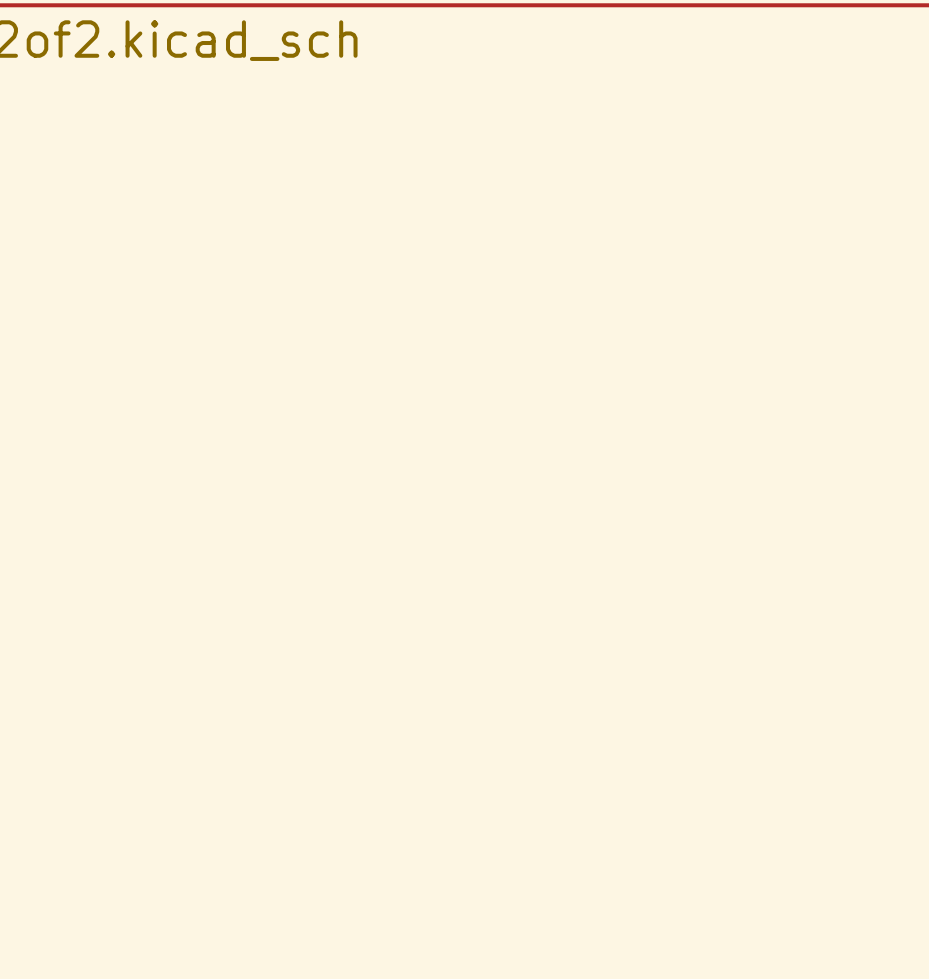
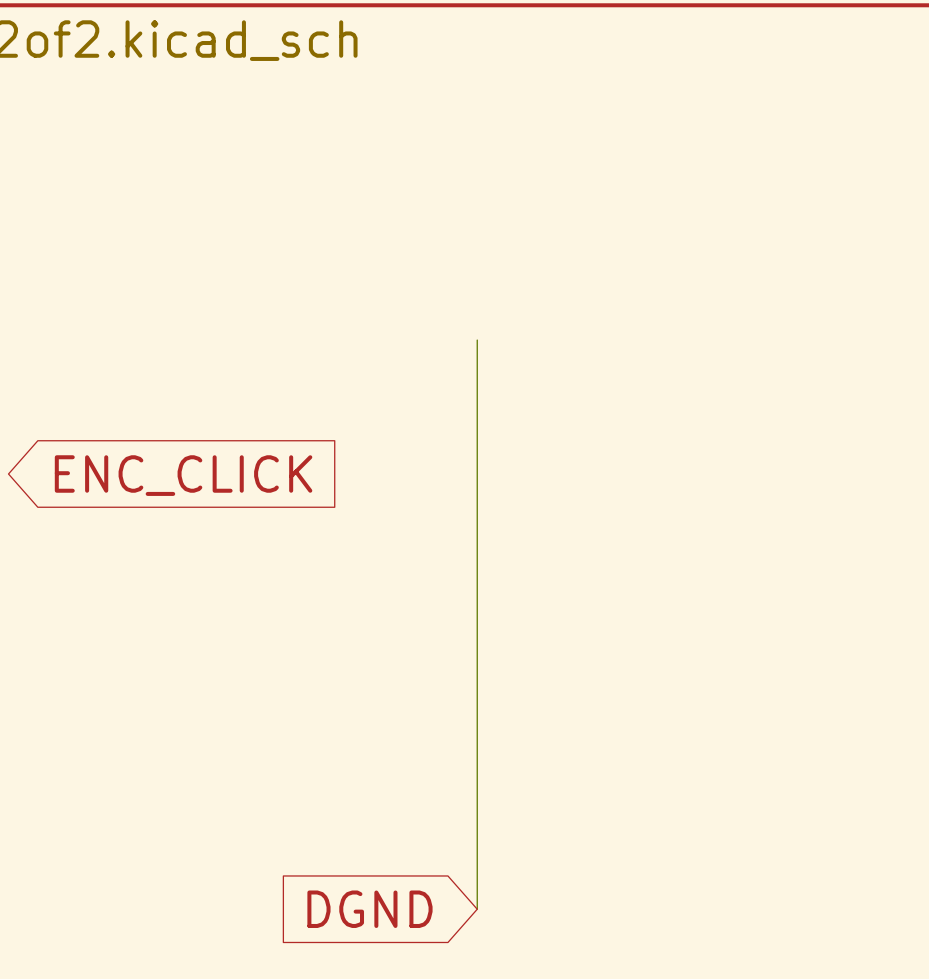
wire: none -> (477, 340) (477, 909)
global label: none -> ENC_CLICK (183, 475)
global label: none -> DGND (369, 909)

